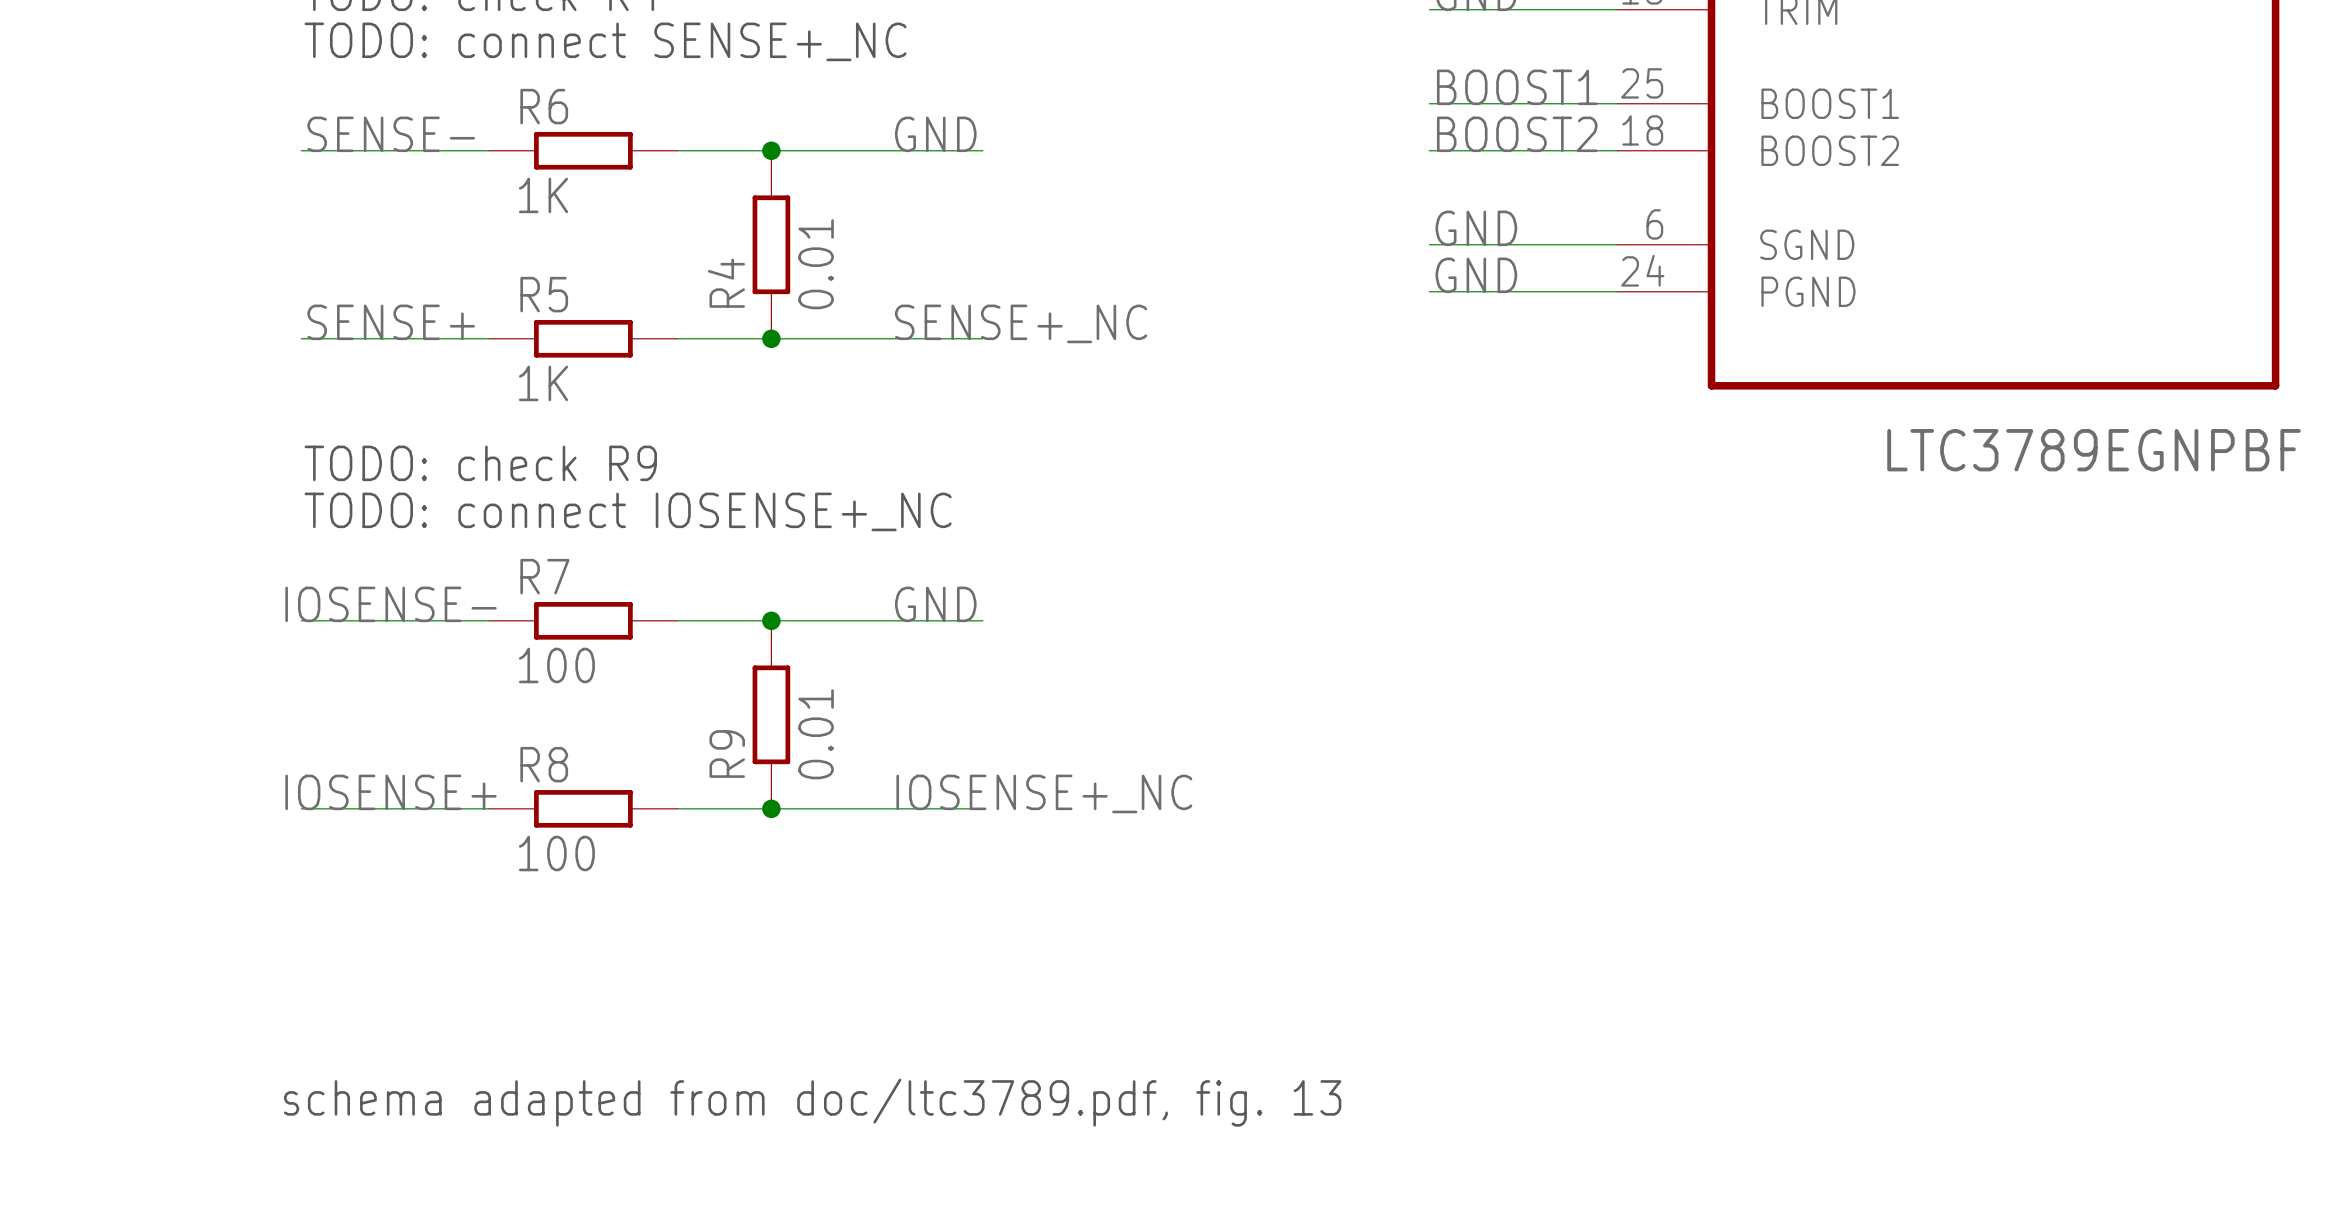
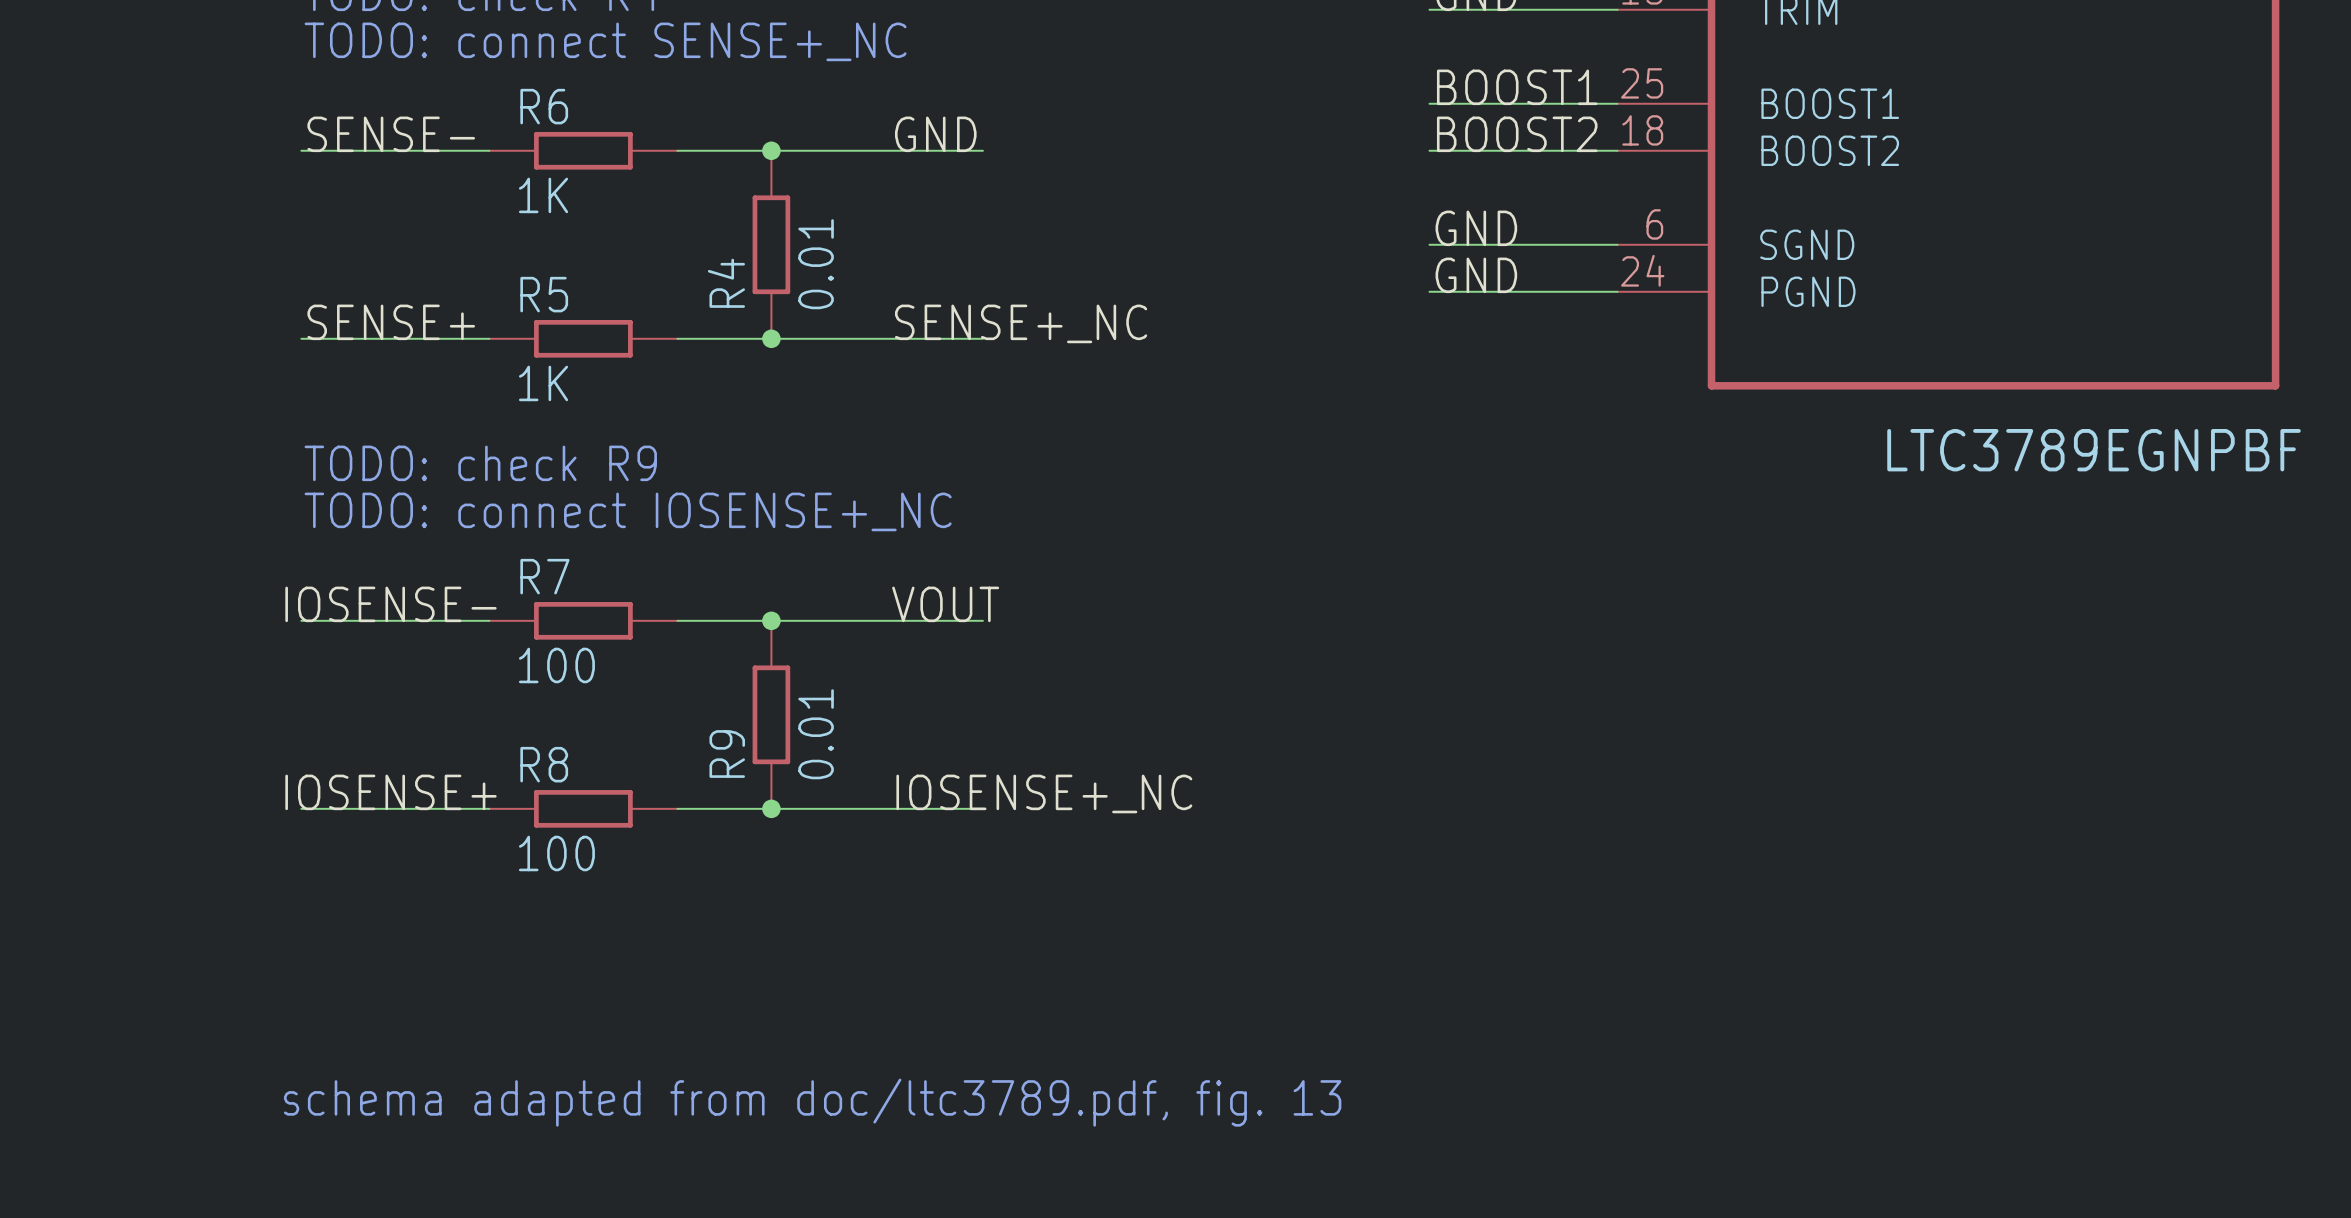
label: GND (935, 604) -> VOUT (945, 604)

